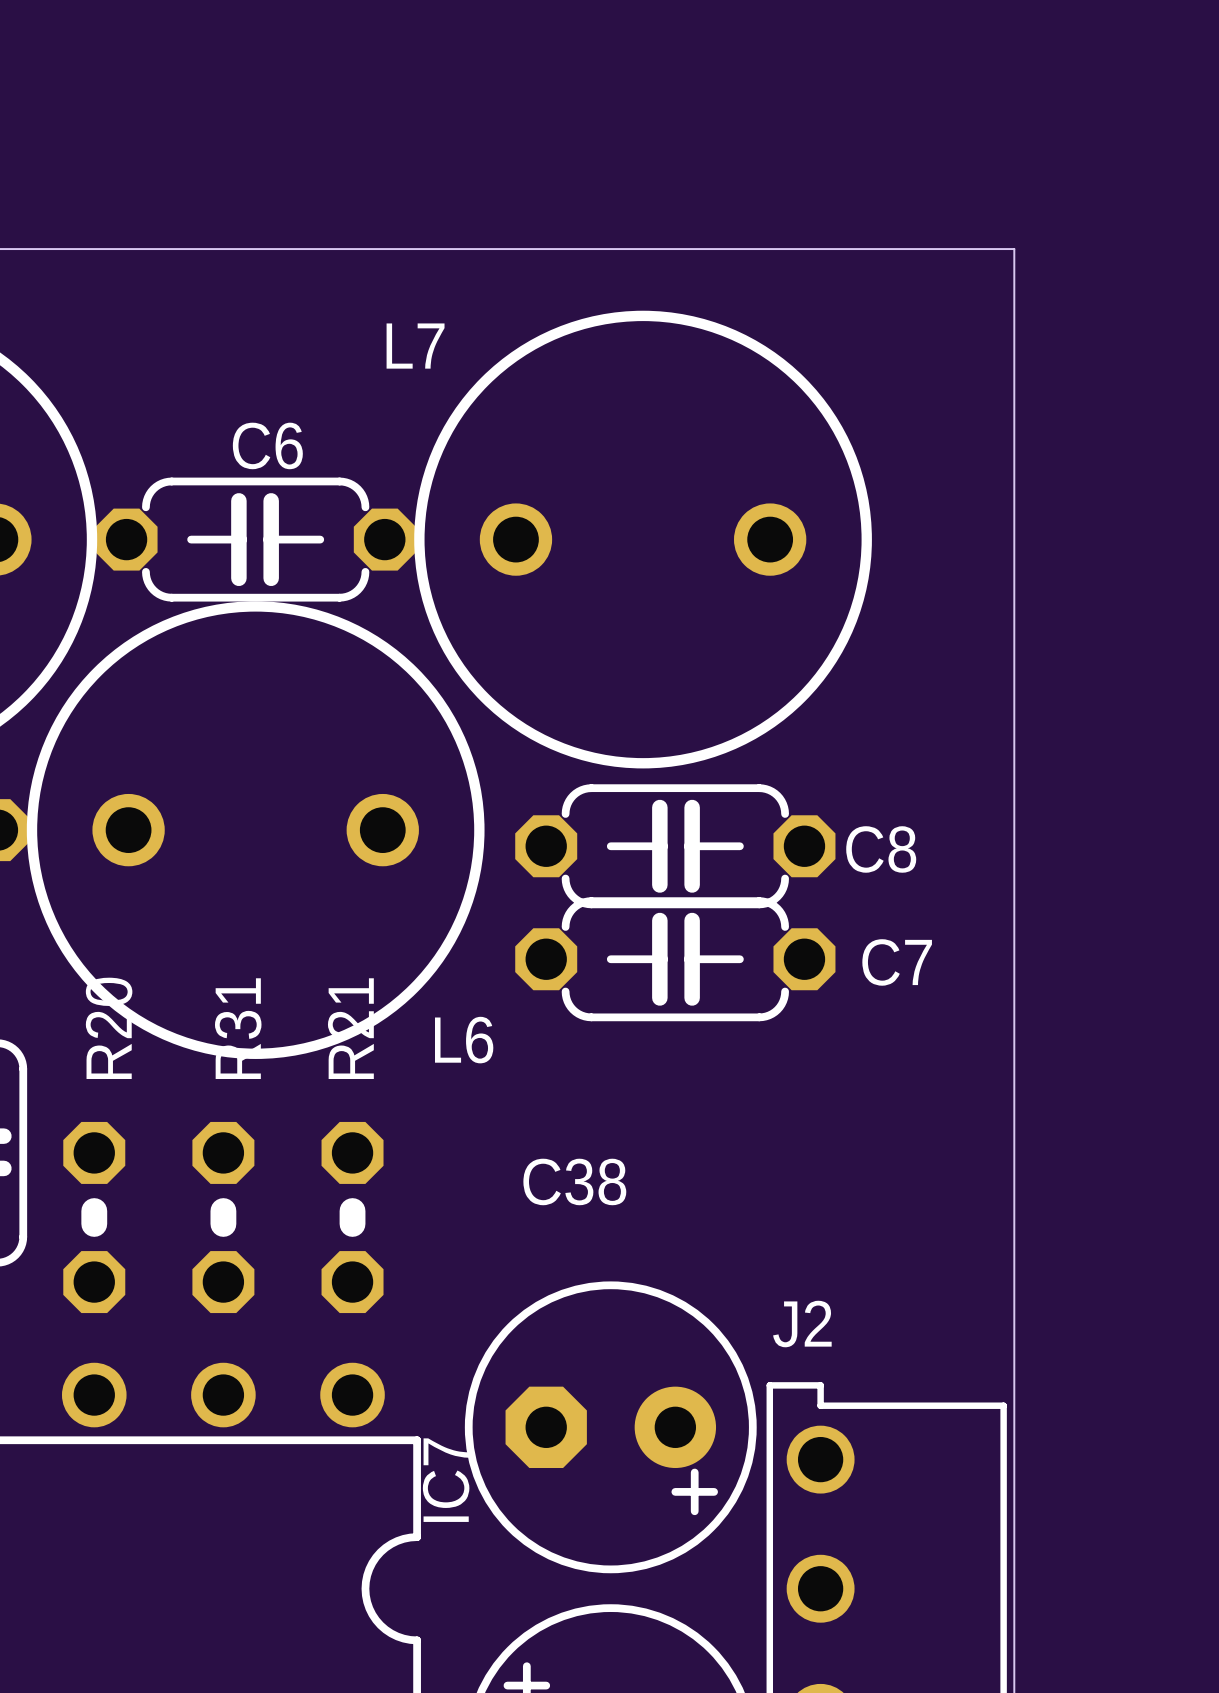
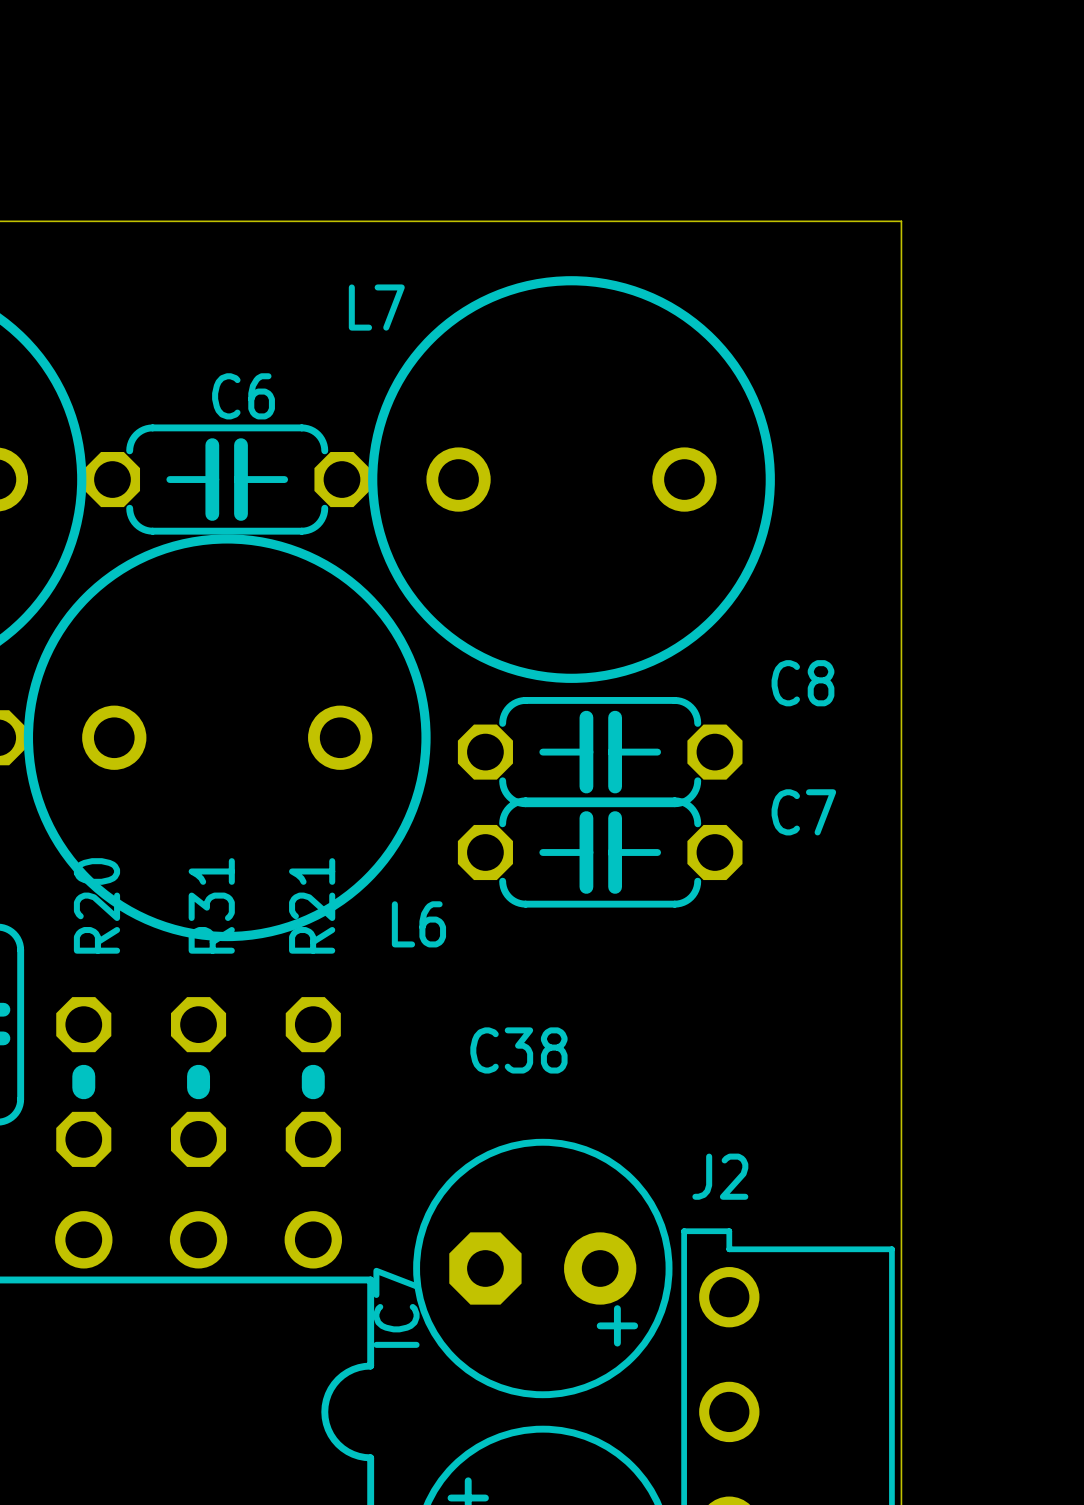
C8 name position: C8 (881, 849) -> C8 (802, 683)
C7 name position: C7 (897, 962) -> C7 (803, 812)

